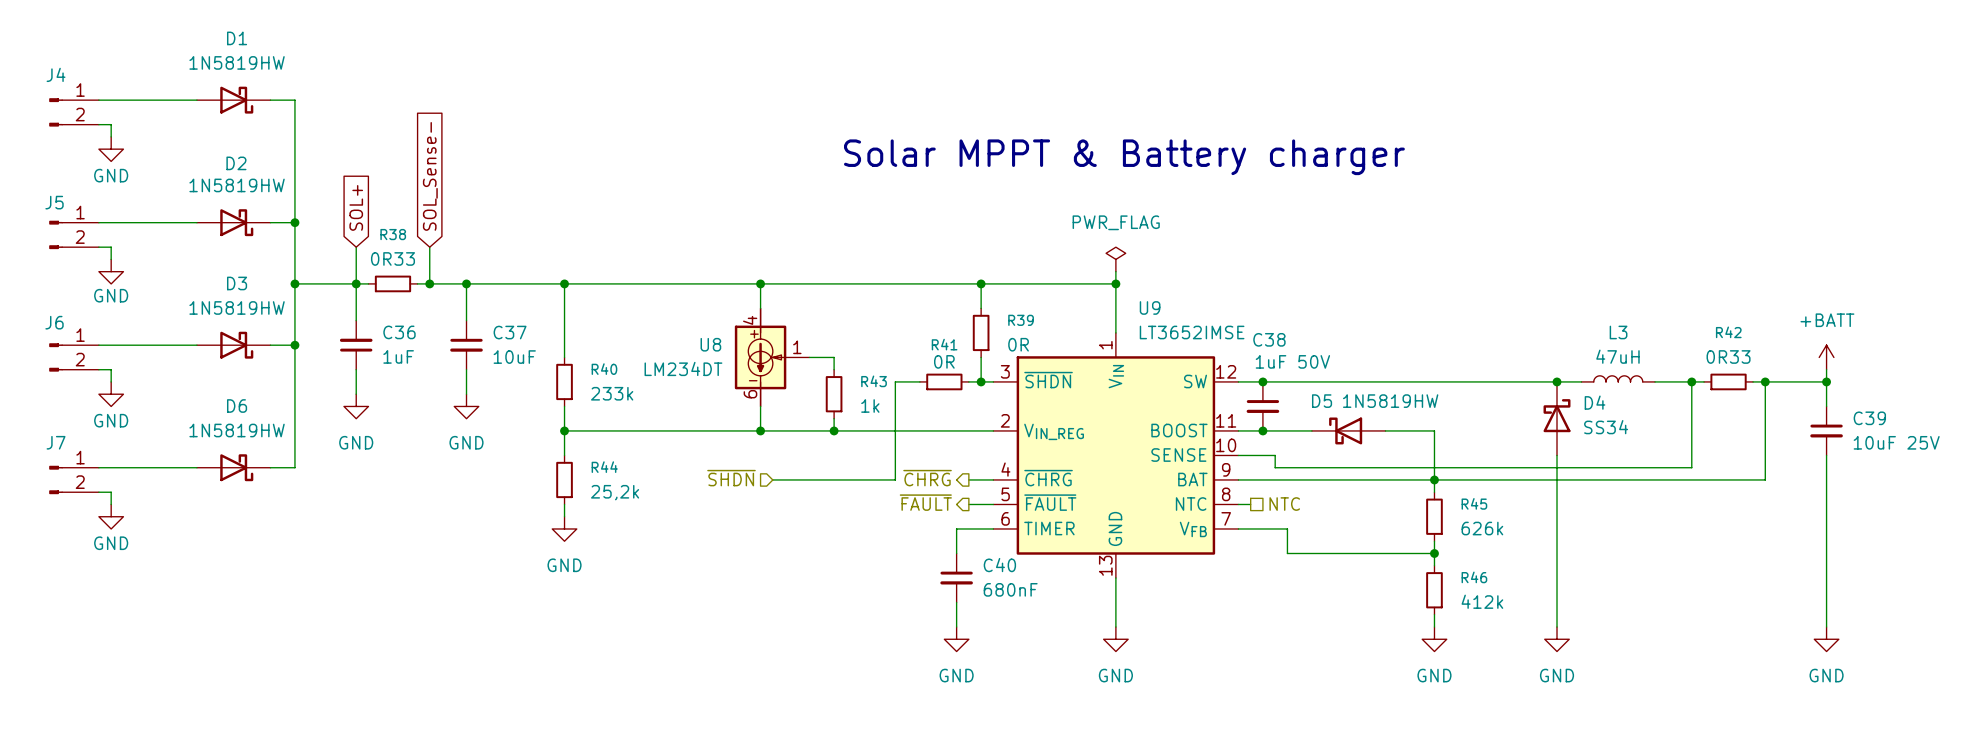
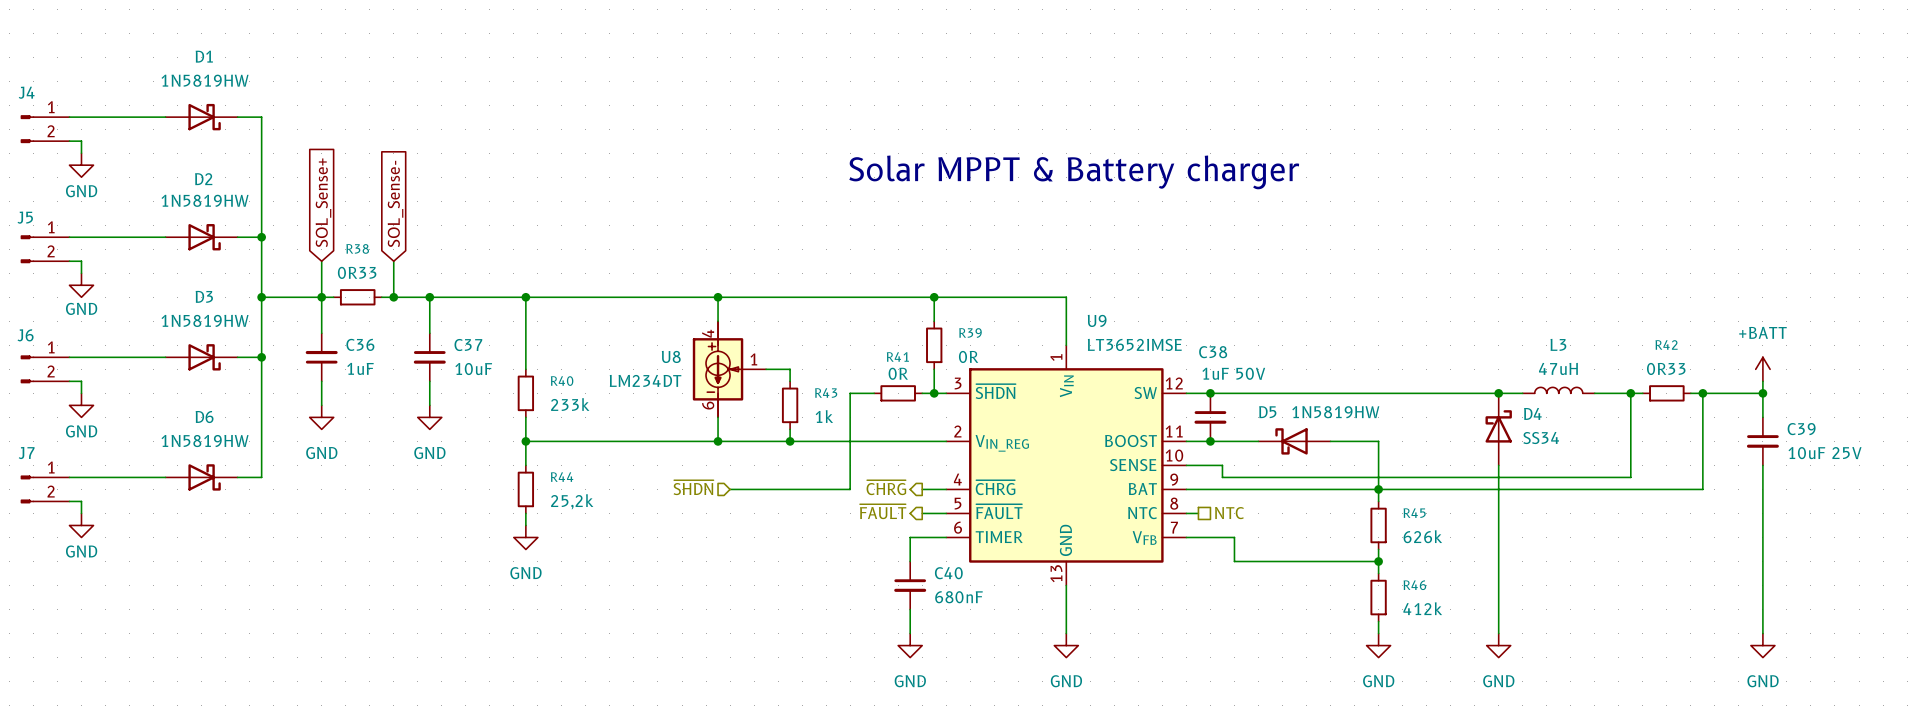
global label: SOL+ (356, 207) -> SOL_Sense+ (323, 202)
power symbol: PWR_FLAG (1115, 259) -> none
wire: (1115, 271) (1115, 283) -> none
junction: (1115, 283) -> none

